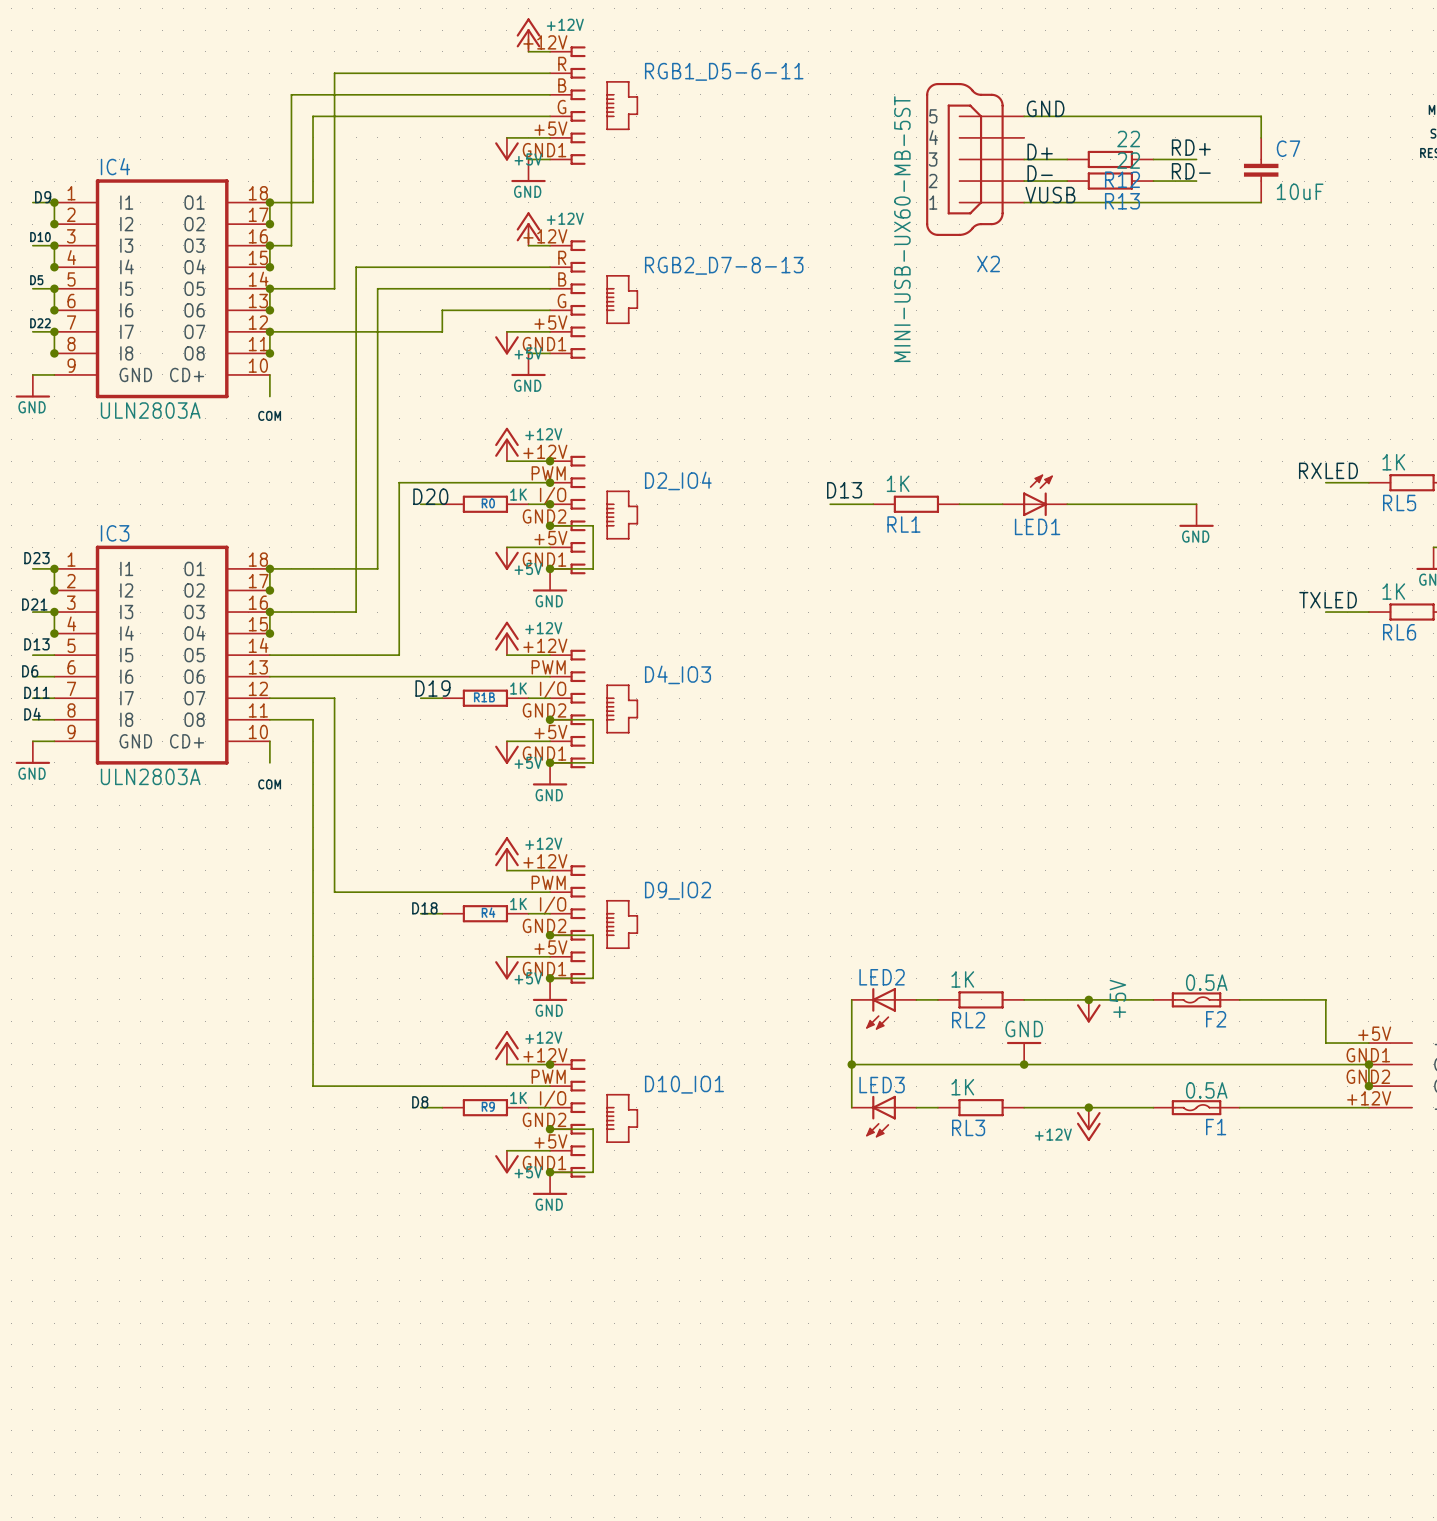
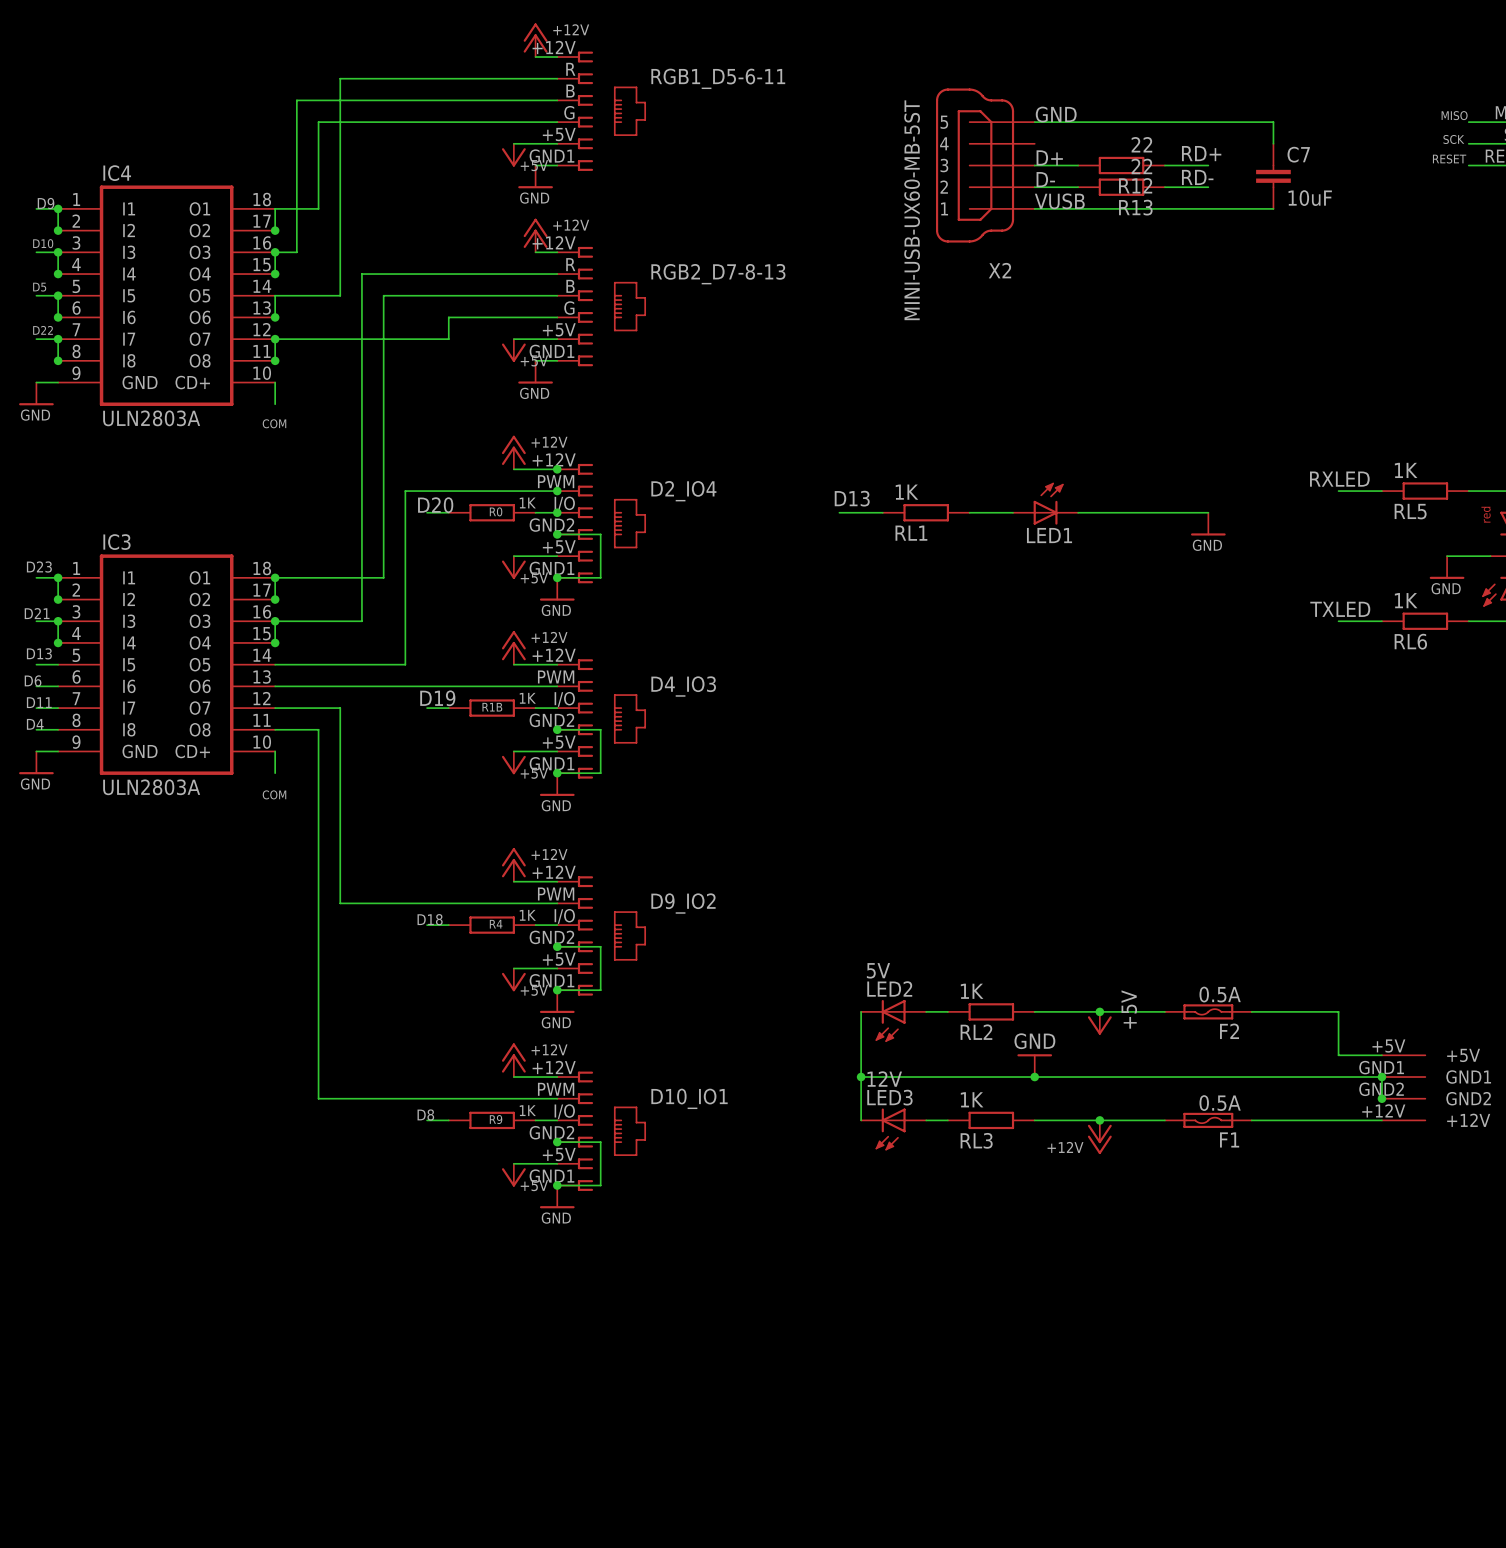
junction: (269, 202) -> none
junction: (269, 288) -> none
LED2 value: none -> 5V (878, 970)
junction: (550, 1064) -> none
LED3 value: none -> 12V (884, 1079)

